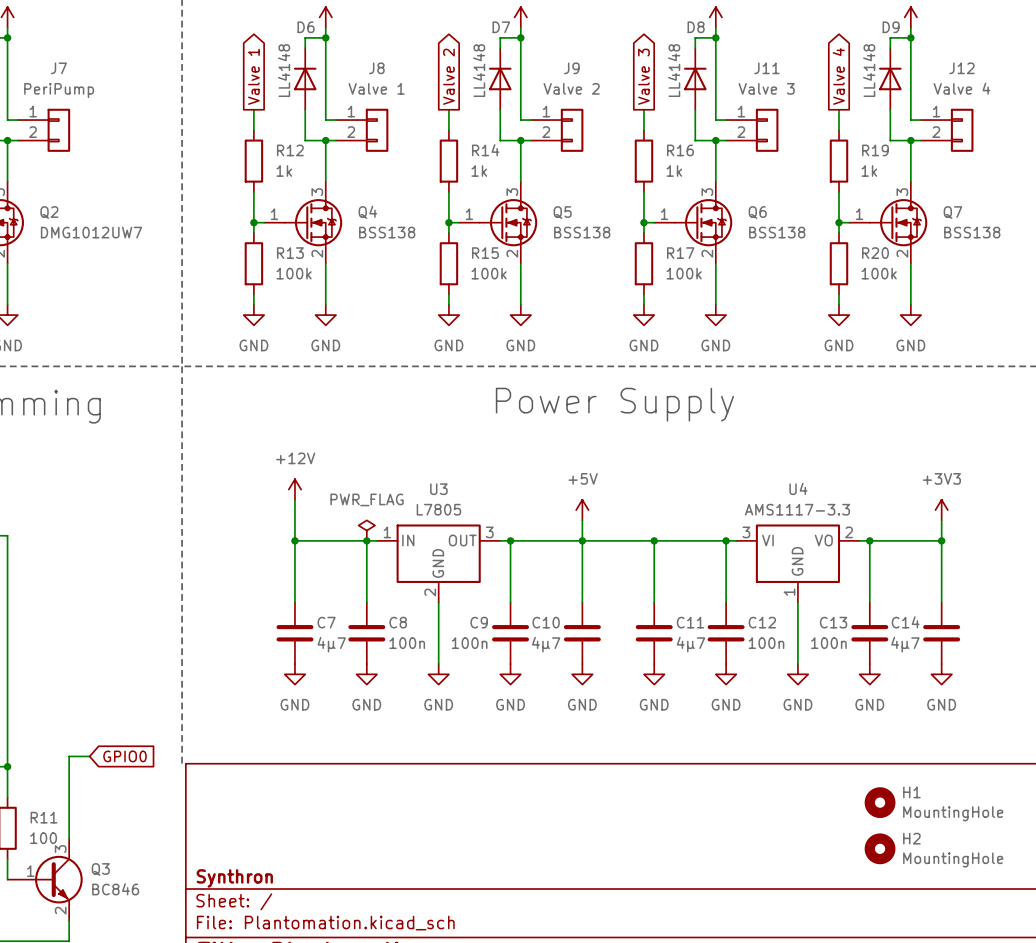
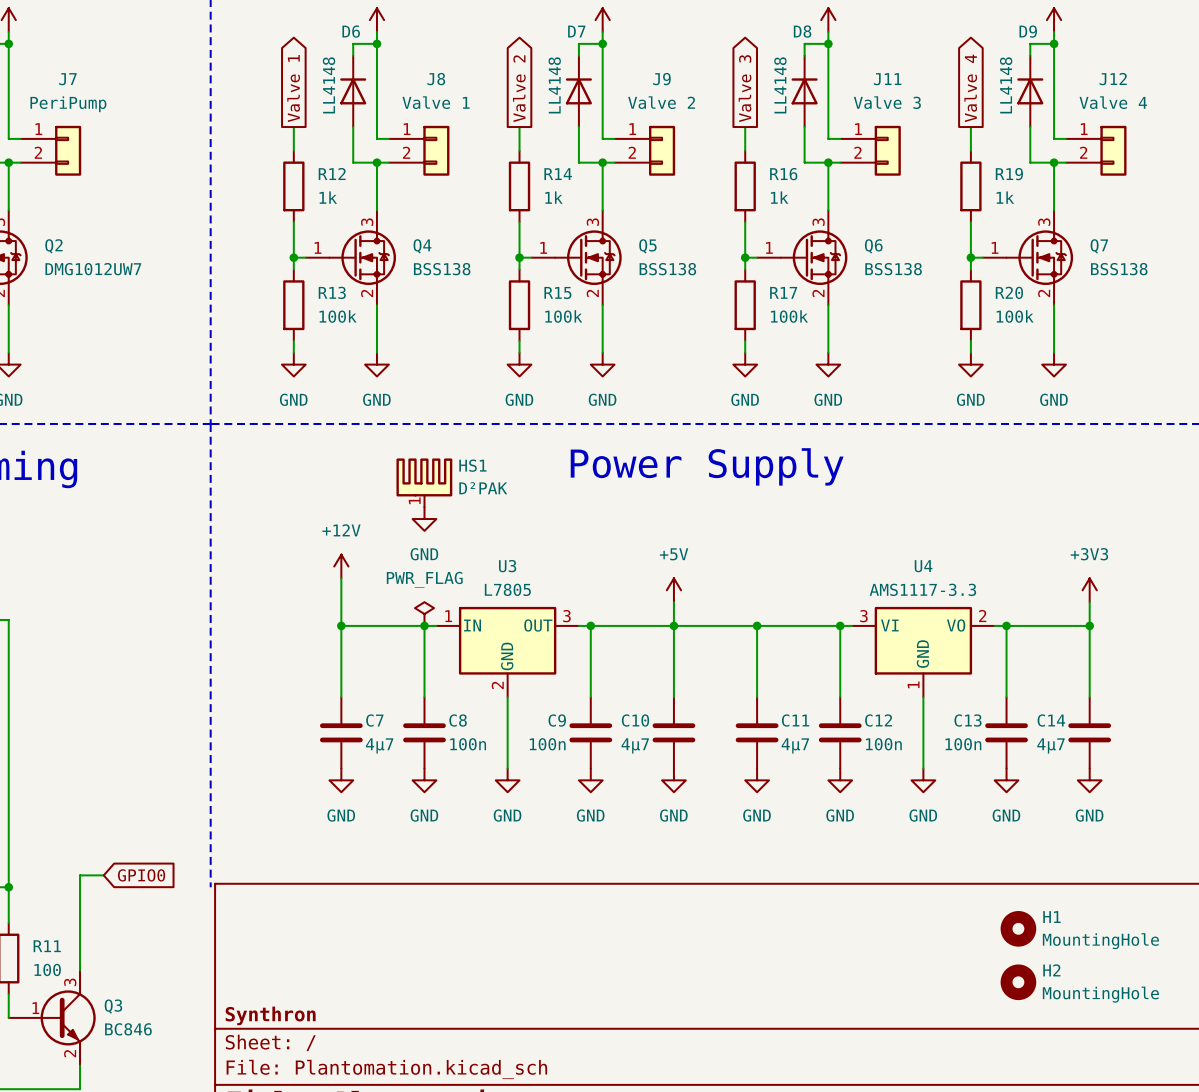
HS1: none -> D²PAK (424, 482)
power symbol: none -> GND (424, 519)

